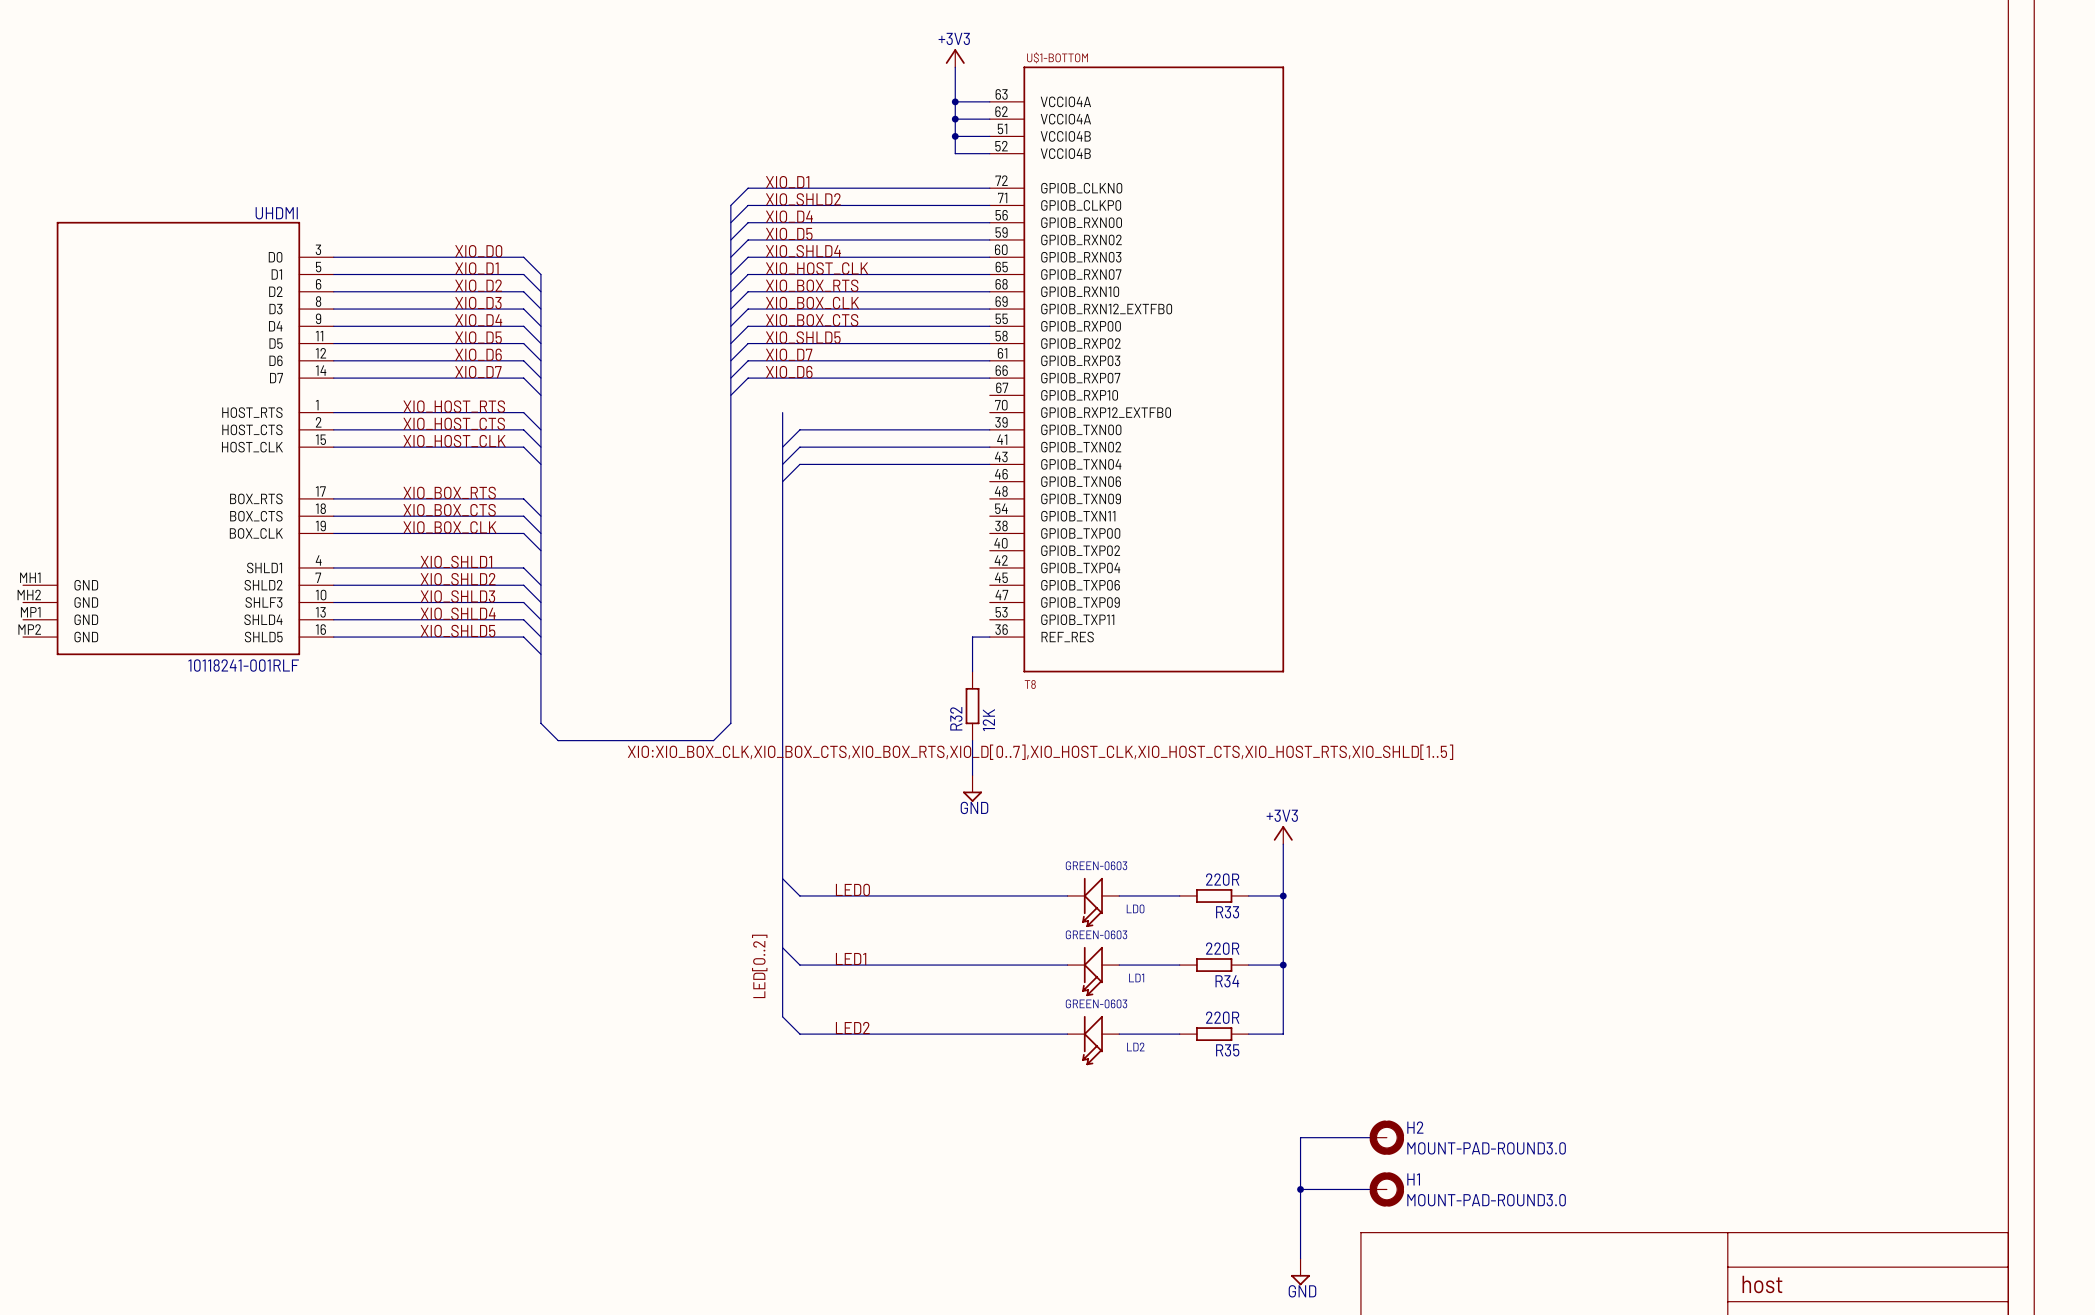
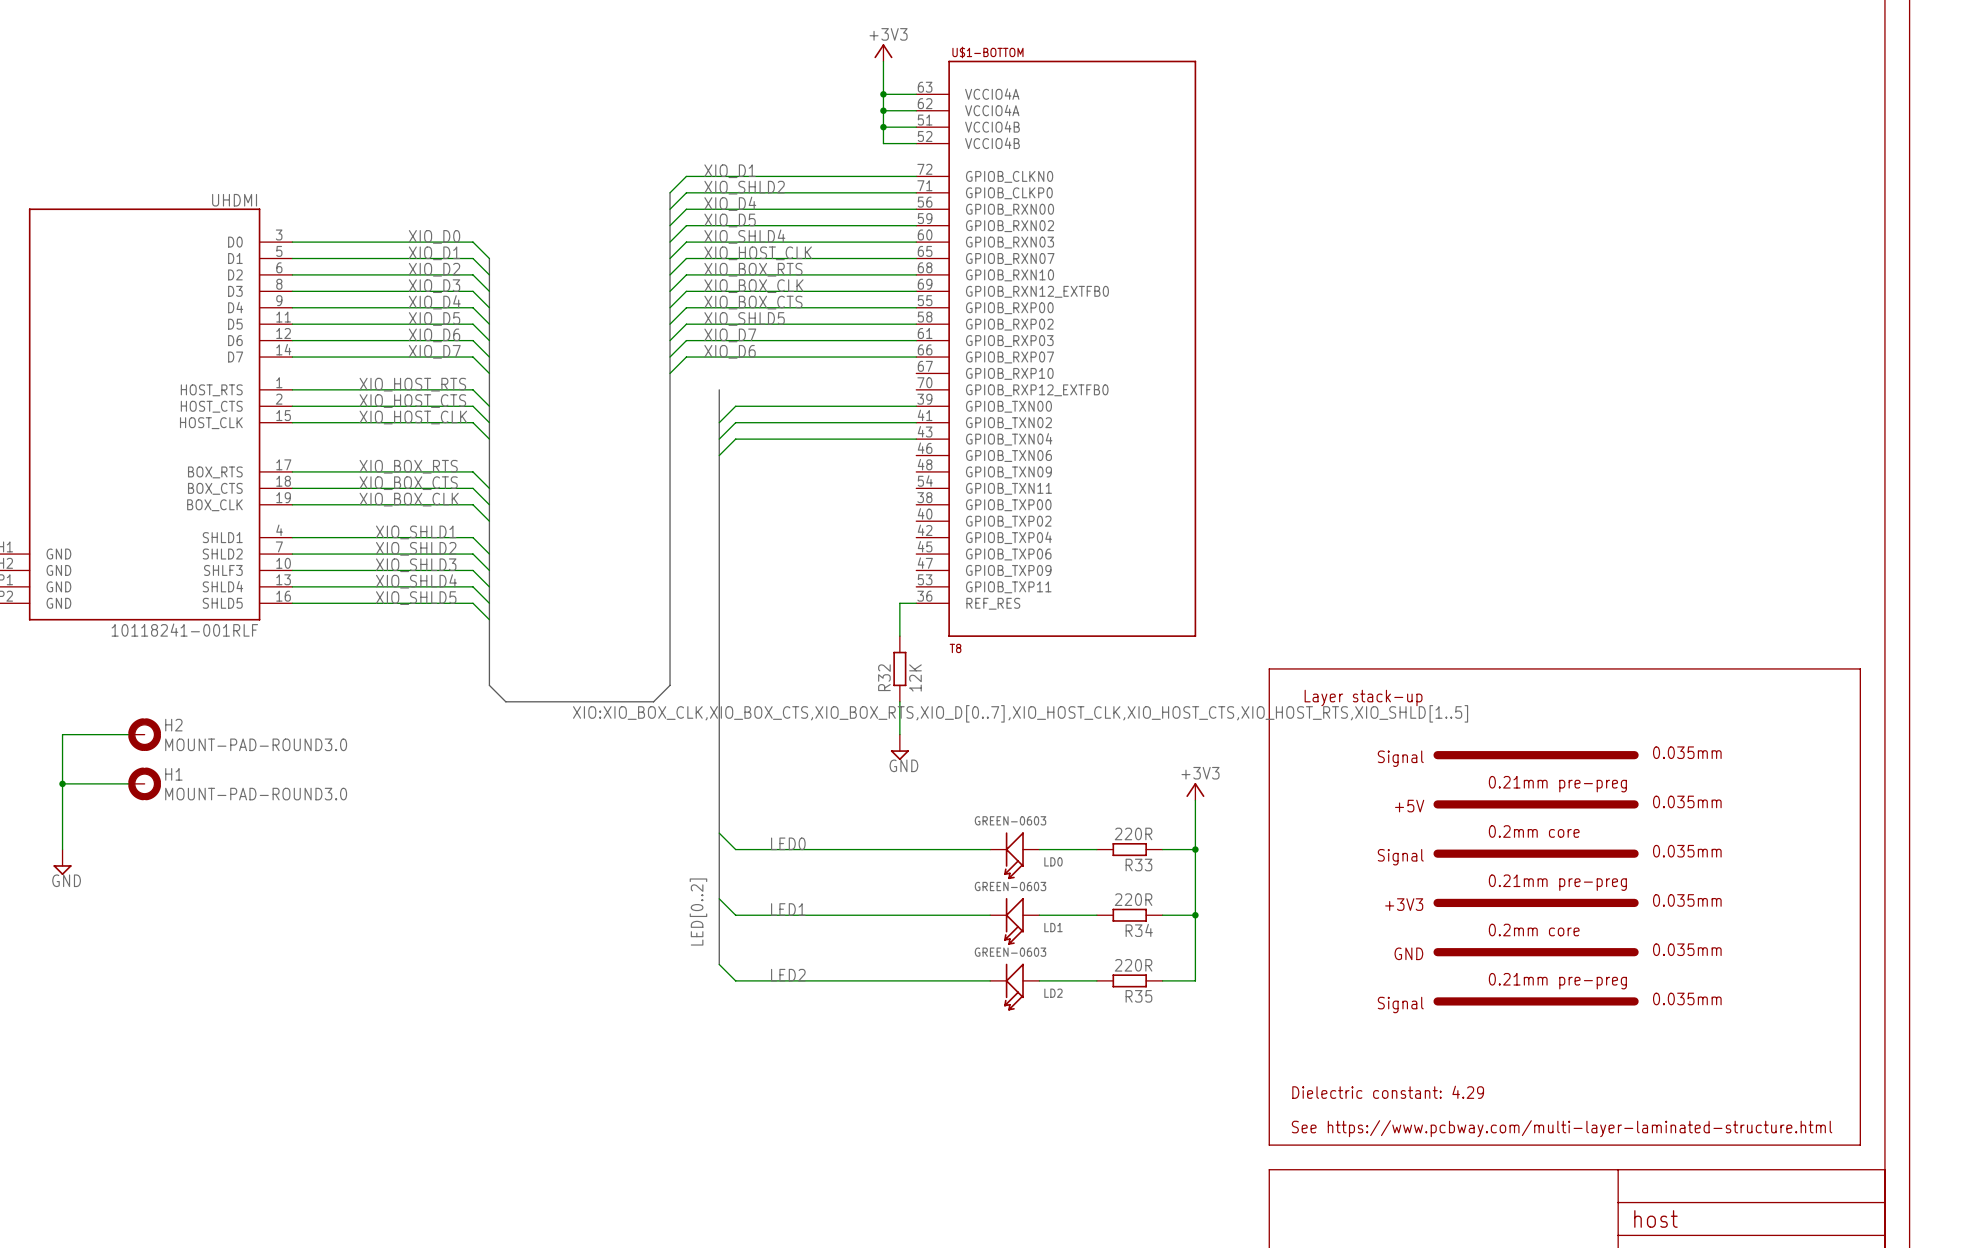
line: none -> (1269, 668) (1860, 668) (1860, 1145) (1269, 1145) (1269, 668)
text: none -> Layer stack-up (1363, 697)
wire: none -> (128, 734) (62, 734) (62, 849)
text: none -> 0.035mm (1687, 752)
line: none -> (1437, 755) (1634, 755)
text: none -> Signal (1400, 758)
wire: none -> (62, 783) (128, 783)
junction: none -> (62, 783)
text: none -> 0.21mm pre-preg (1557, 784)
text: none -> 0.035mm (1687, 801)
line: none -> (1437, 804) (1634, 804)
text: none -> +5V (1409, 806)
text: none -> 0.2mm core (1534, 831)
text: none -> 0.035mm (1687, 851)
line: none -> (1437, 853) (1634, 853)
text: none -> Signal (1400, 857)
power symbol: none -> GND (62, 862)
text: none -> 0.21mm pre-preg (1557, 882)
text: none -> 0.035mm (1687, 900)
line: none -> (1437, 902) (1634, 902)
text: none -> +3V3 (1404, 904)
text: none -> 0.2mm core (1534, 930)
text: none -> 0.035mm (1687, 949)
line: none -> (1437, 952) (1634, 952)
text: none -> GND (1408, 953)
text: none -> 0.21mm pre-preg (1557, 981)
text: none -> 0.035mm (1687, 998)
line: none -> (1437, 1001) (1634, 1001)
text: none -> Signal (1400, 1004)
wire: (1369, 1137) (1300, 1137) (1300, 1258) -> none
H2 position: (1386, 1137) -> (144, 734)
text: none -> Dielectric constant: 4.29 (1388, 1092)
wire: (1300, 1189) (1369, 1189) -> none
junction: (1300, 1189) -> none
H1 position: (1386, 1189) -> (144, 783)
text: none -> See https://www.pcbway.com/multi-layer-laminated-structure.html (1562, 1128)
power symbol: GND (1300, 1271) -> none

